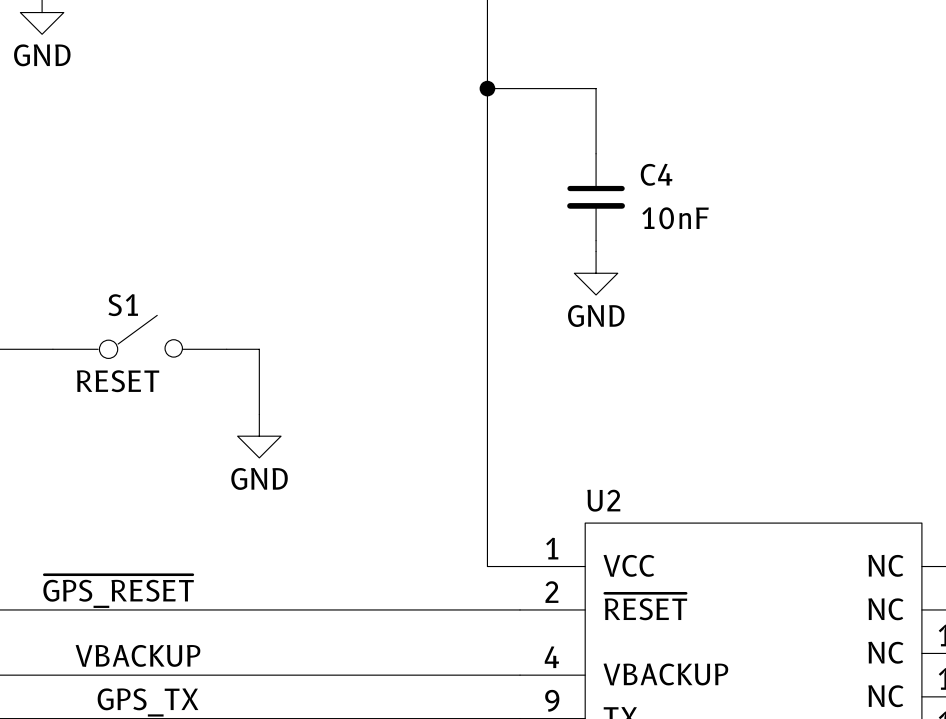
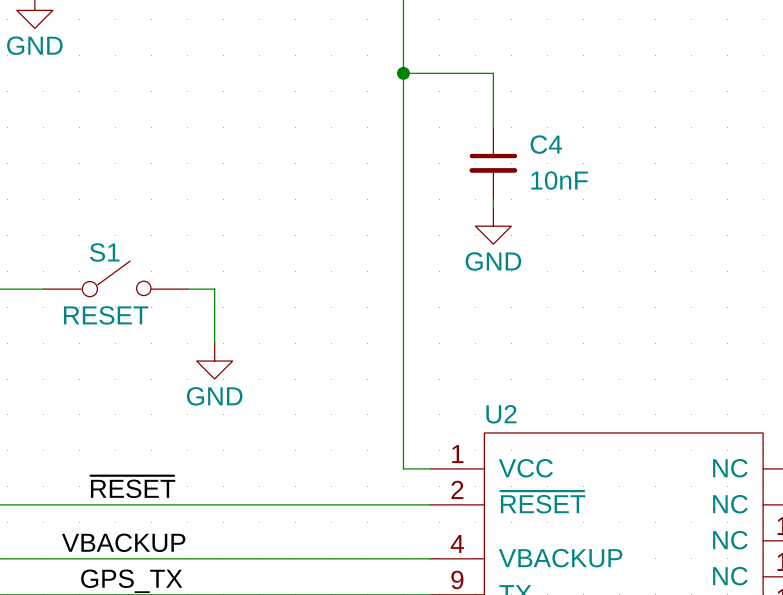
label: ~{GPS_RESET} (118, 591) -> ~{RESET} (132, 486)

